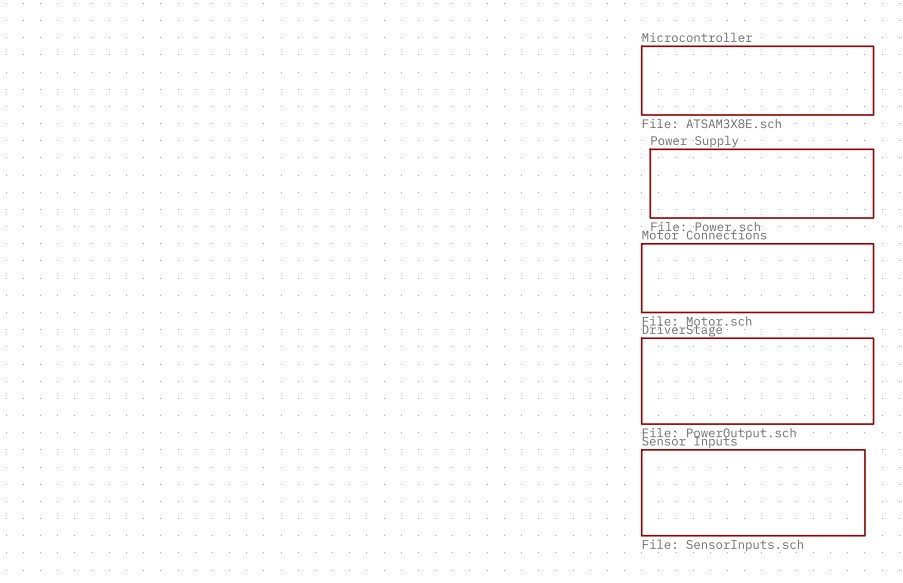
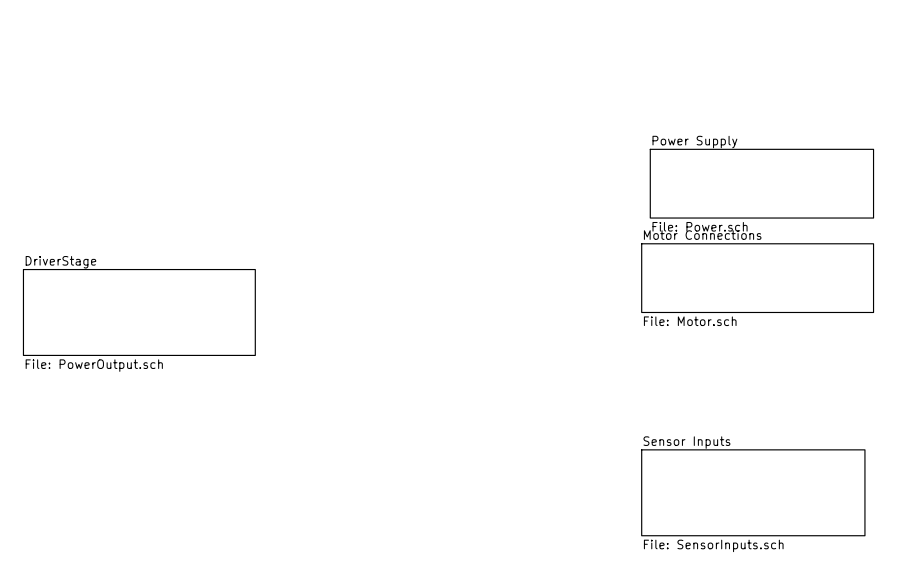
sheet Microcontroller: File: ATSAM3X8E.sch (757, 80) -> none
sheet DriverStage: none -> File: PowerOutput.sch (139, 312)
sheet DriverStage: File: PowerOutput.sch (757, 381) -> none

